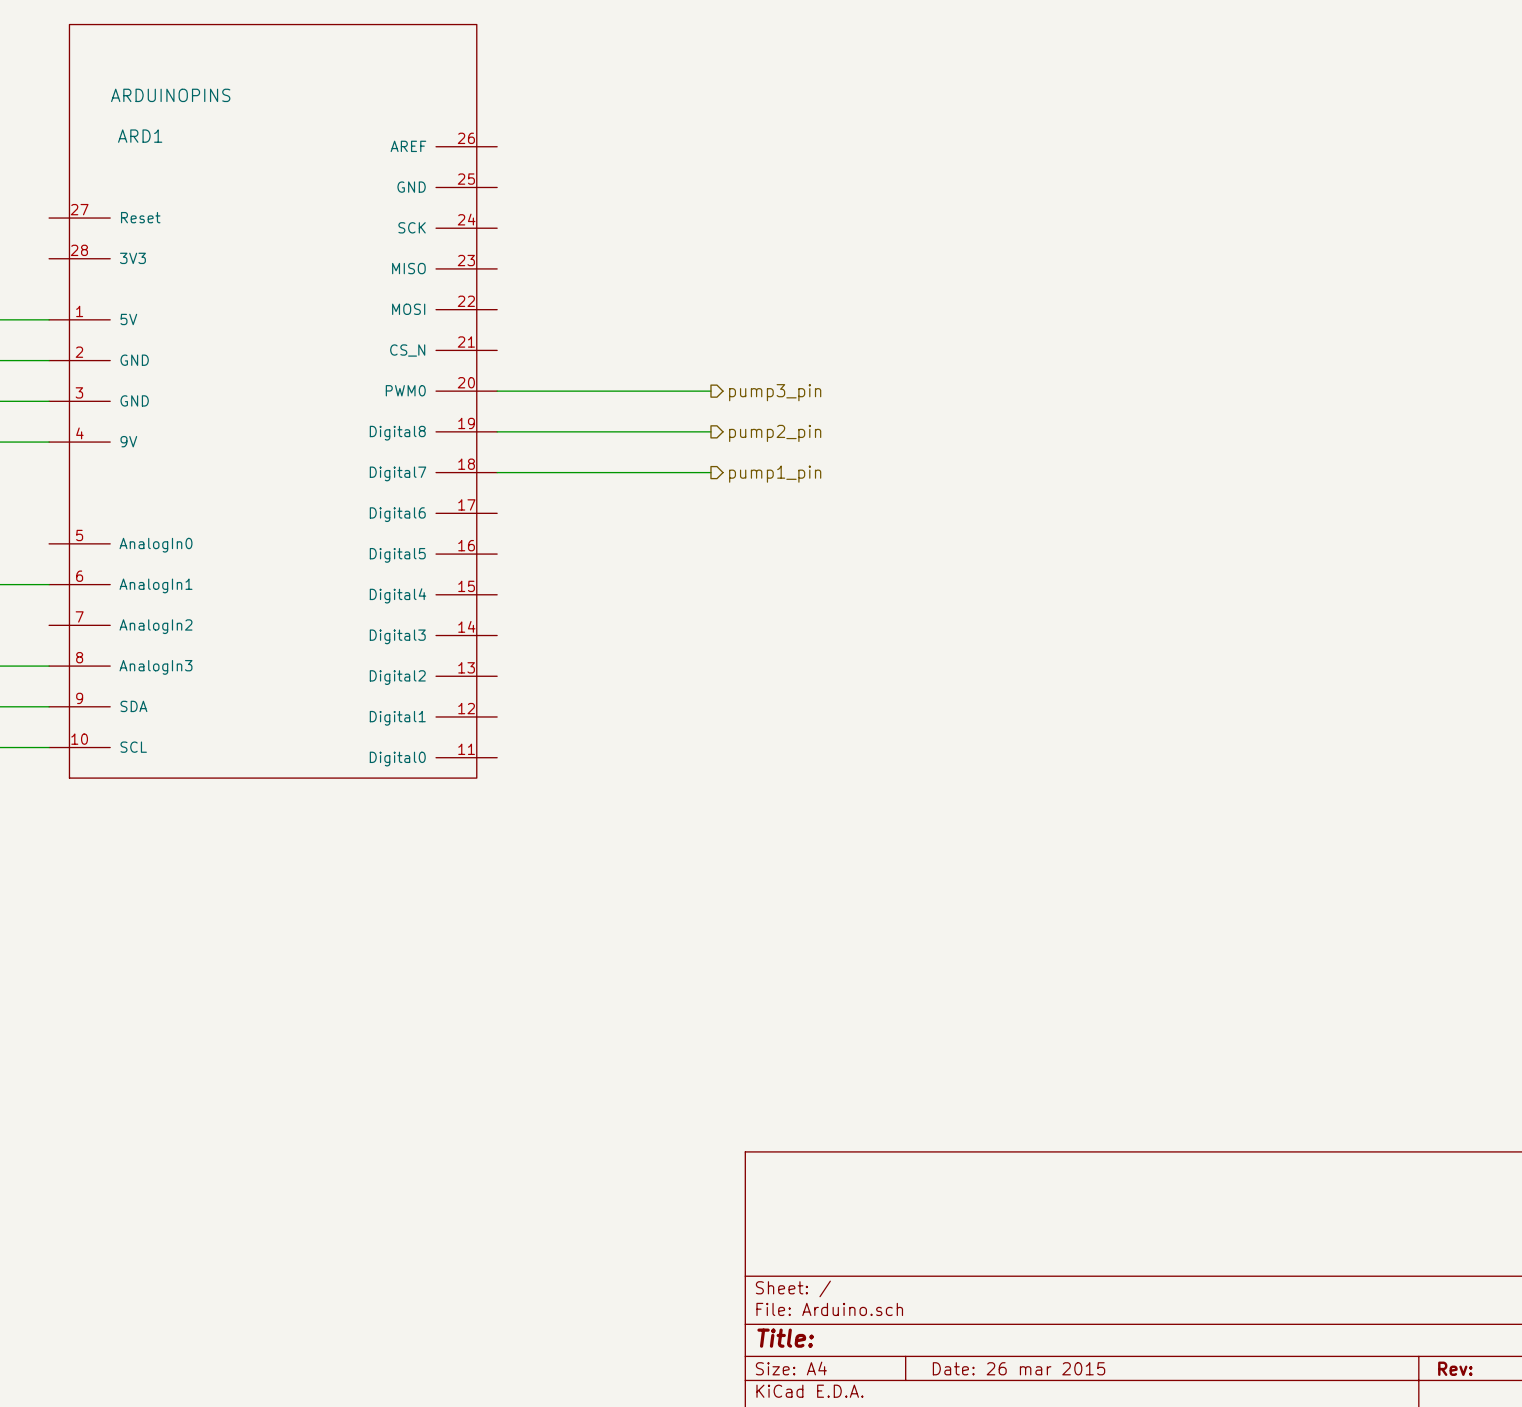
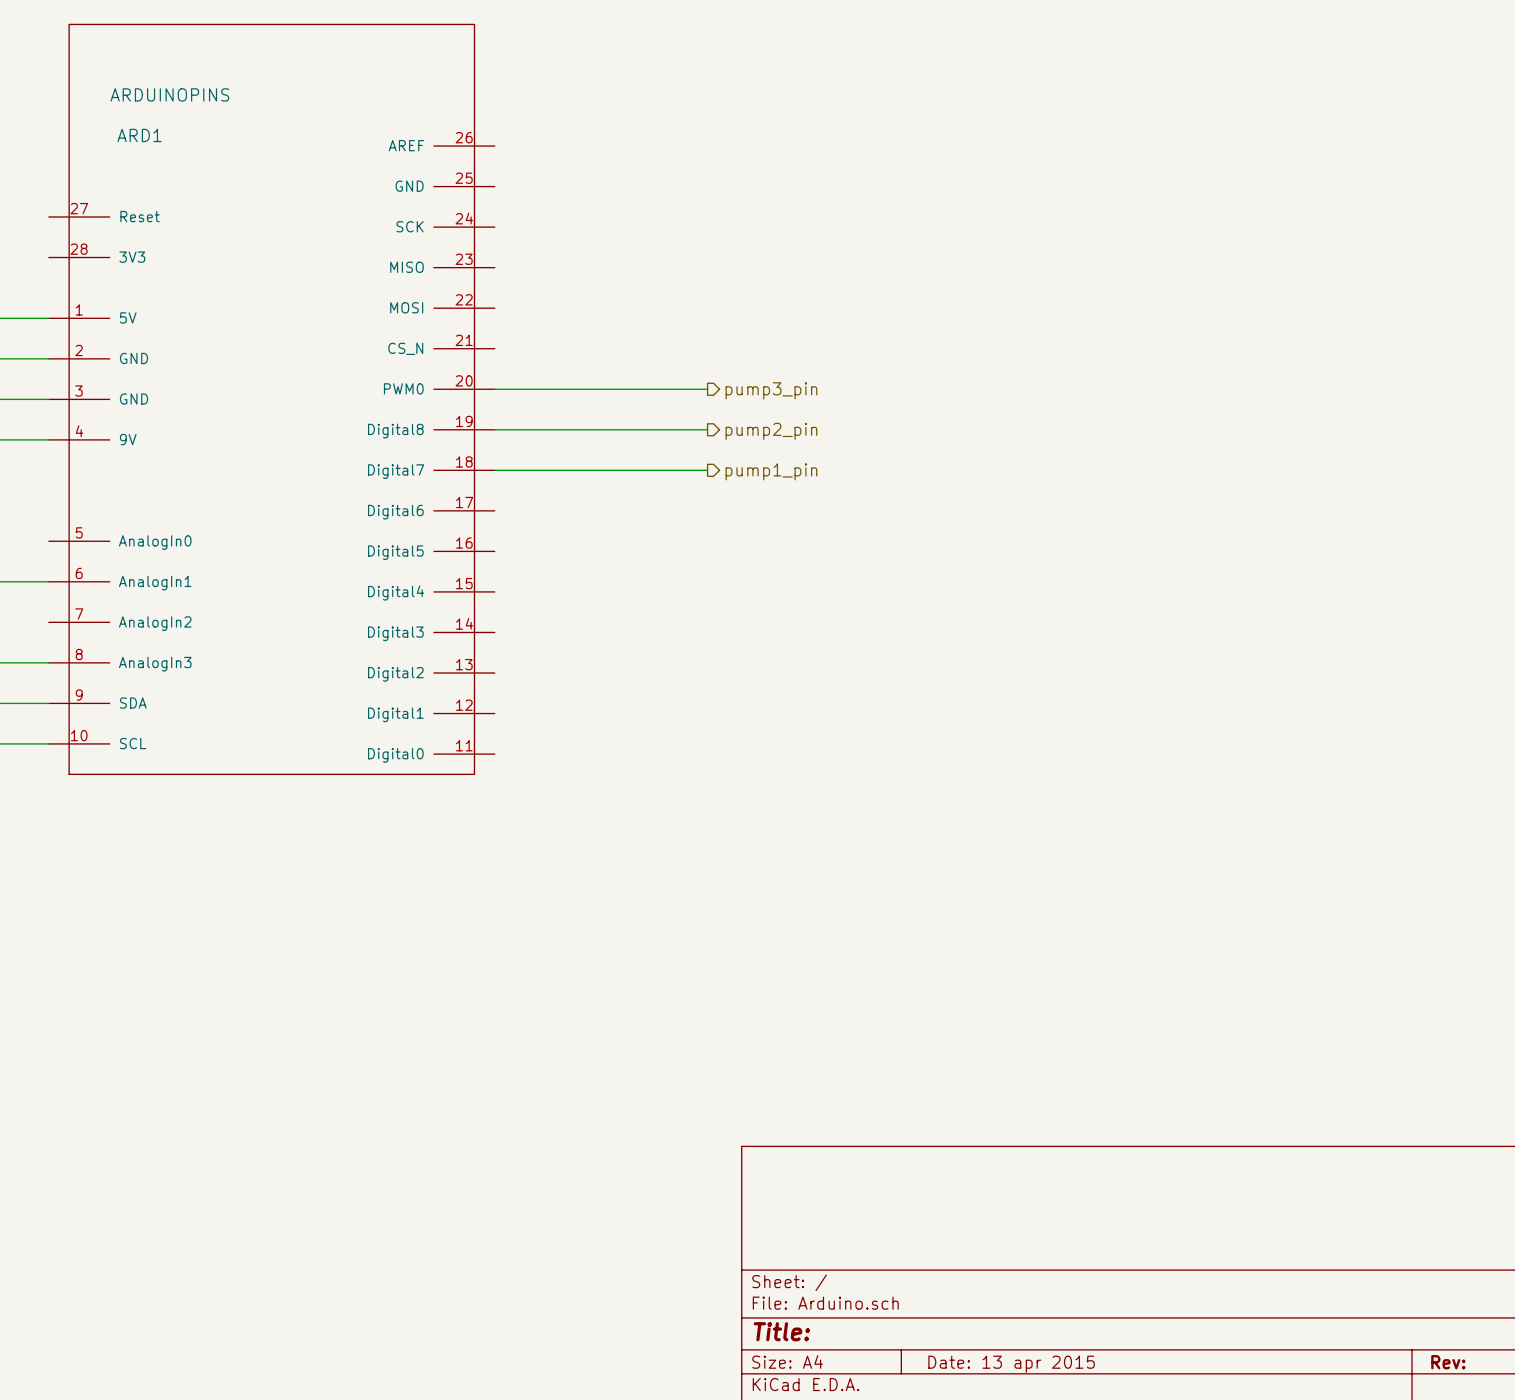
title block: Date: 26 mar 2015 (1019, 1368) -> Date: 13 apr 2015 (1011, 1364)

